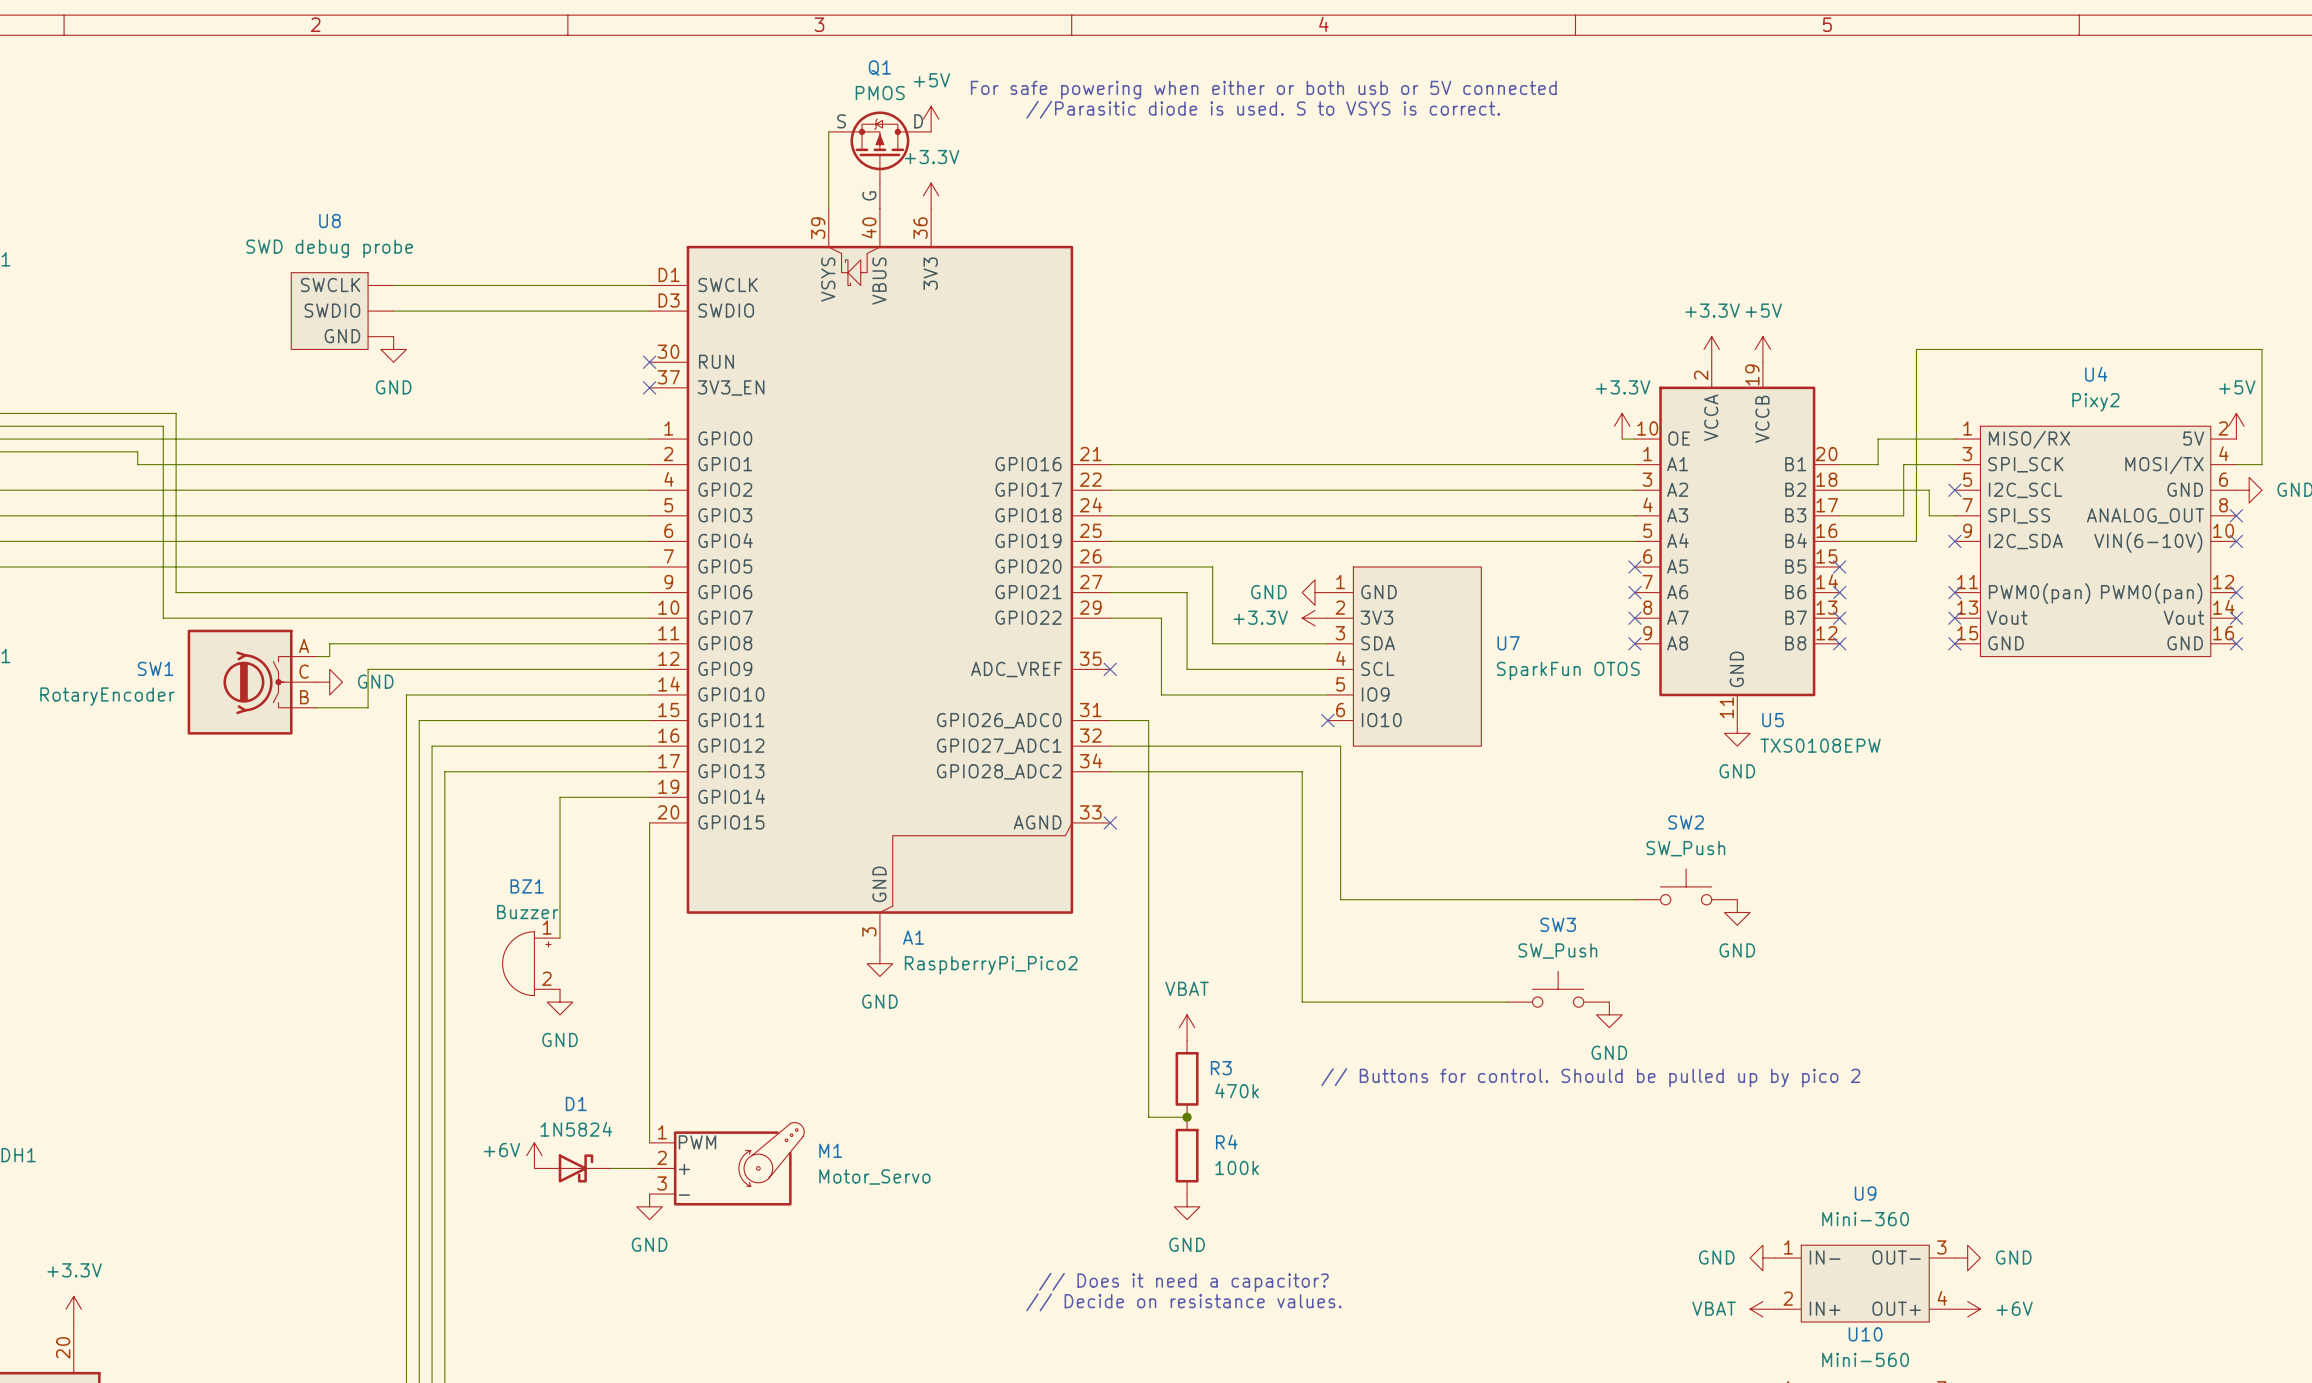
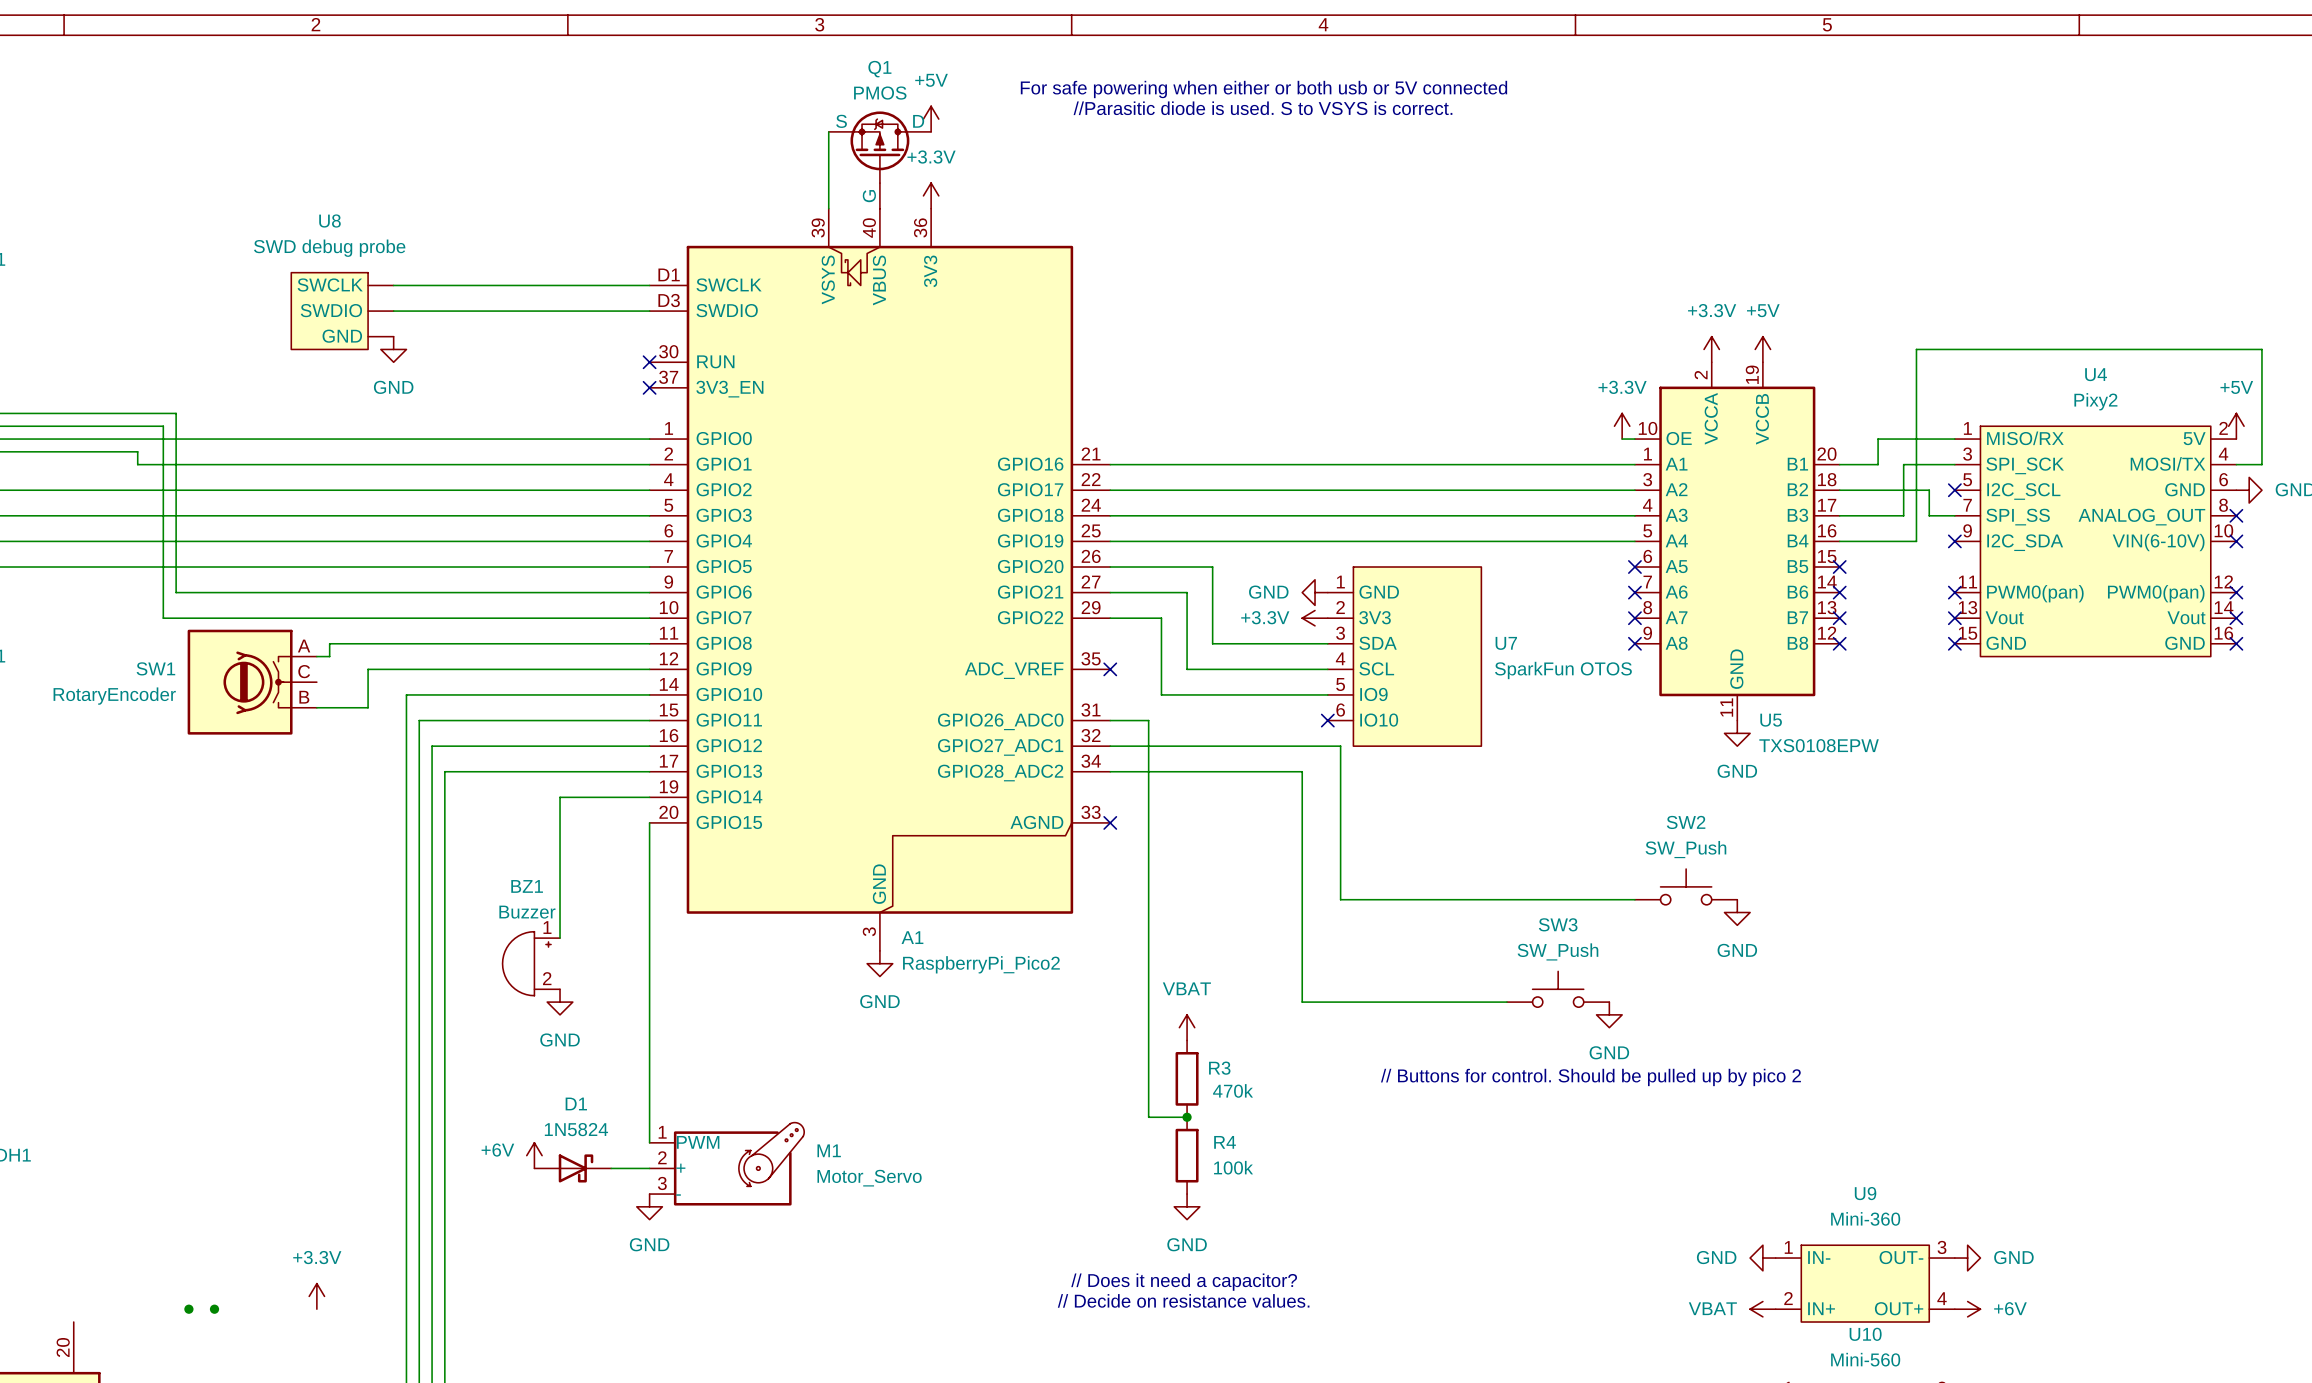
power symbol: GND (329, 682) -> none
power symbol: none -> +3.3V (316, 1296)
power symbol: +3.3V (73, 1309) -> none
junction: none -> (188, 1309)
junction: none -> (214, 1309)

